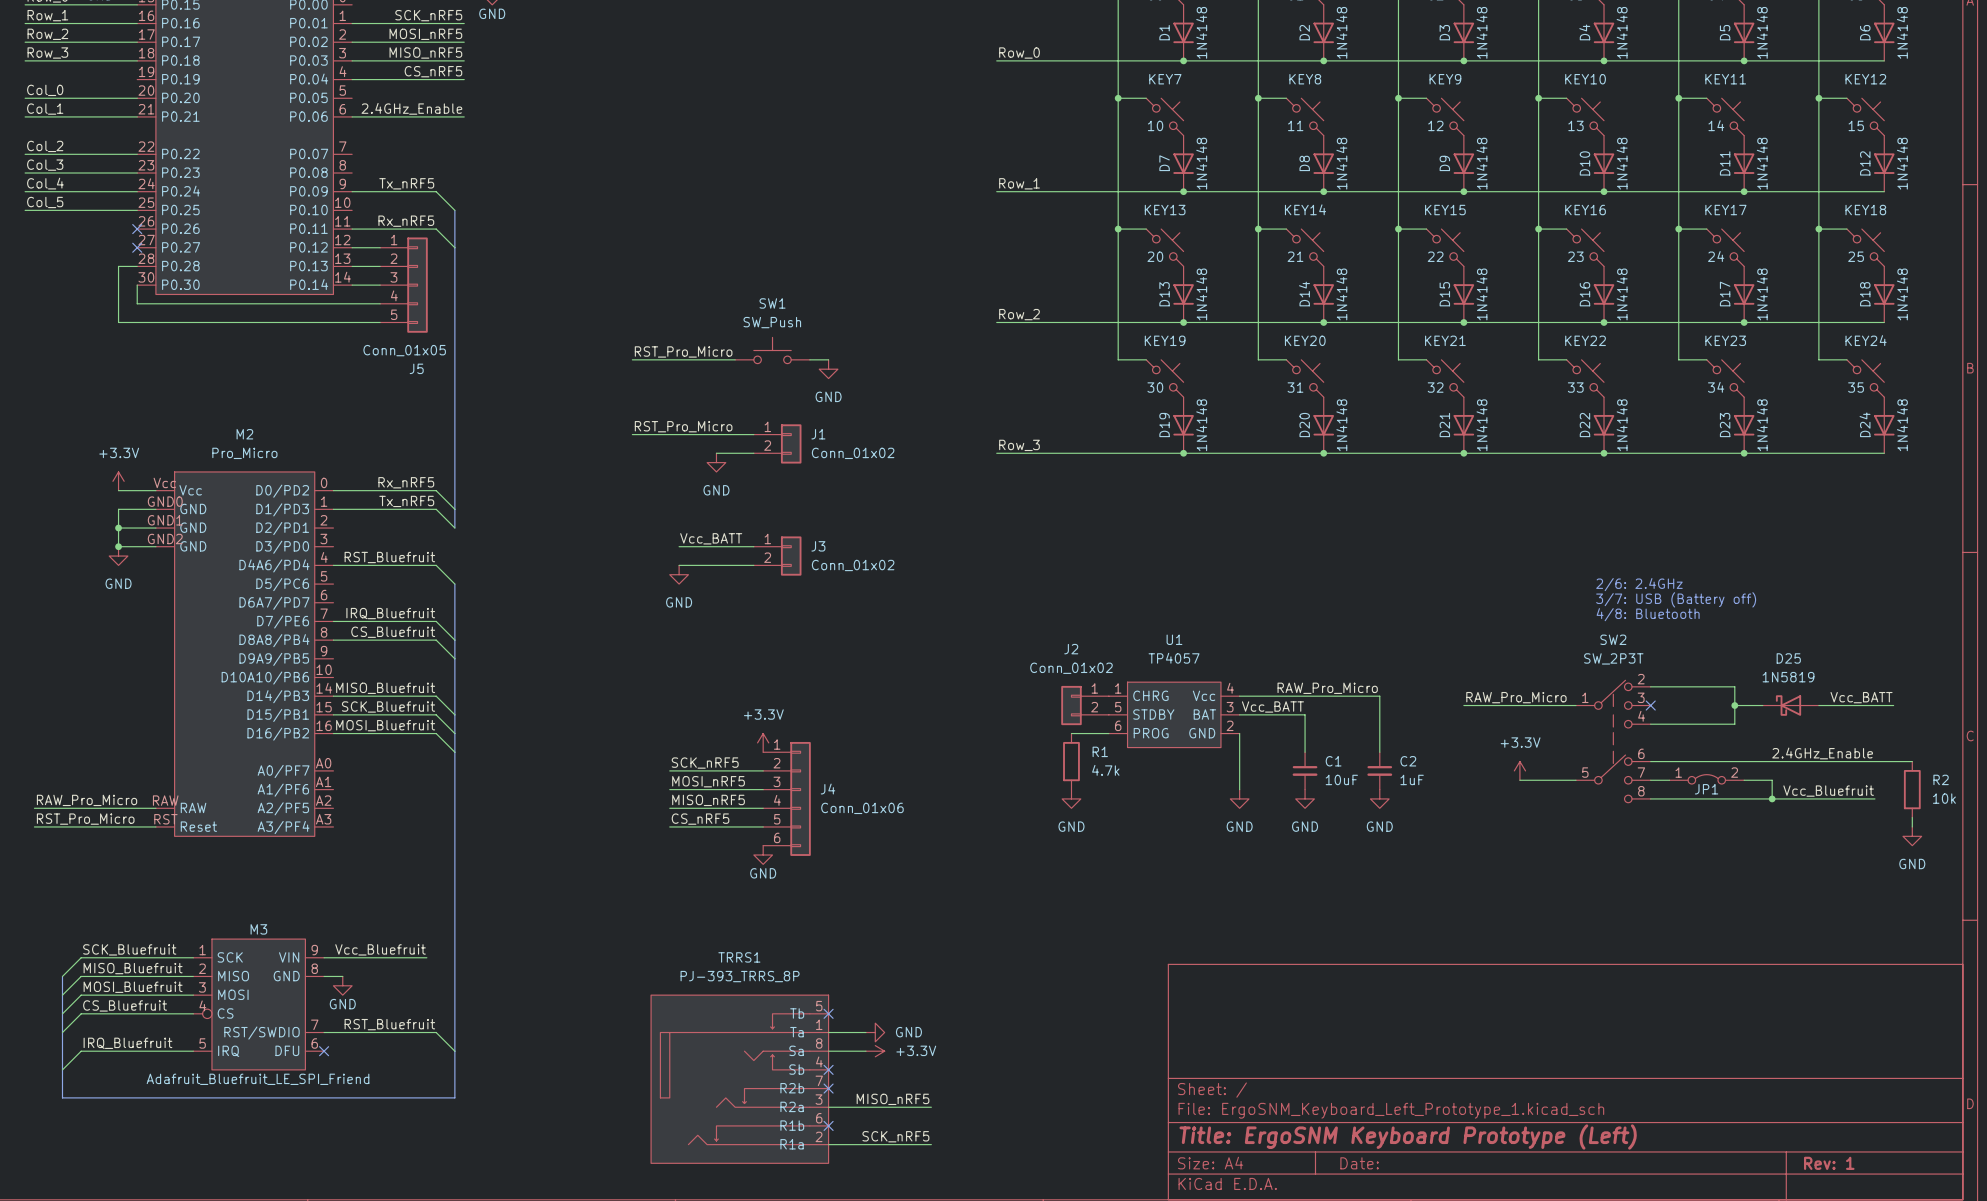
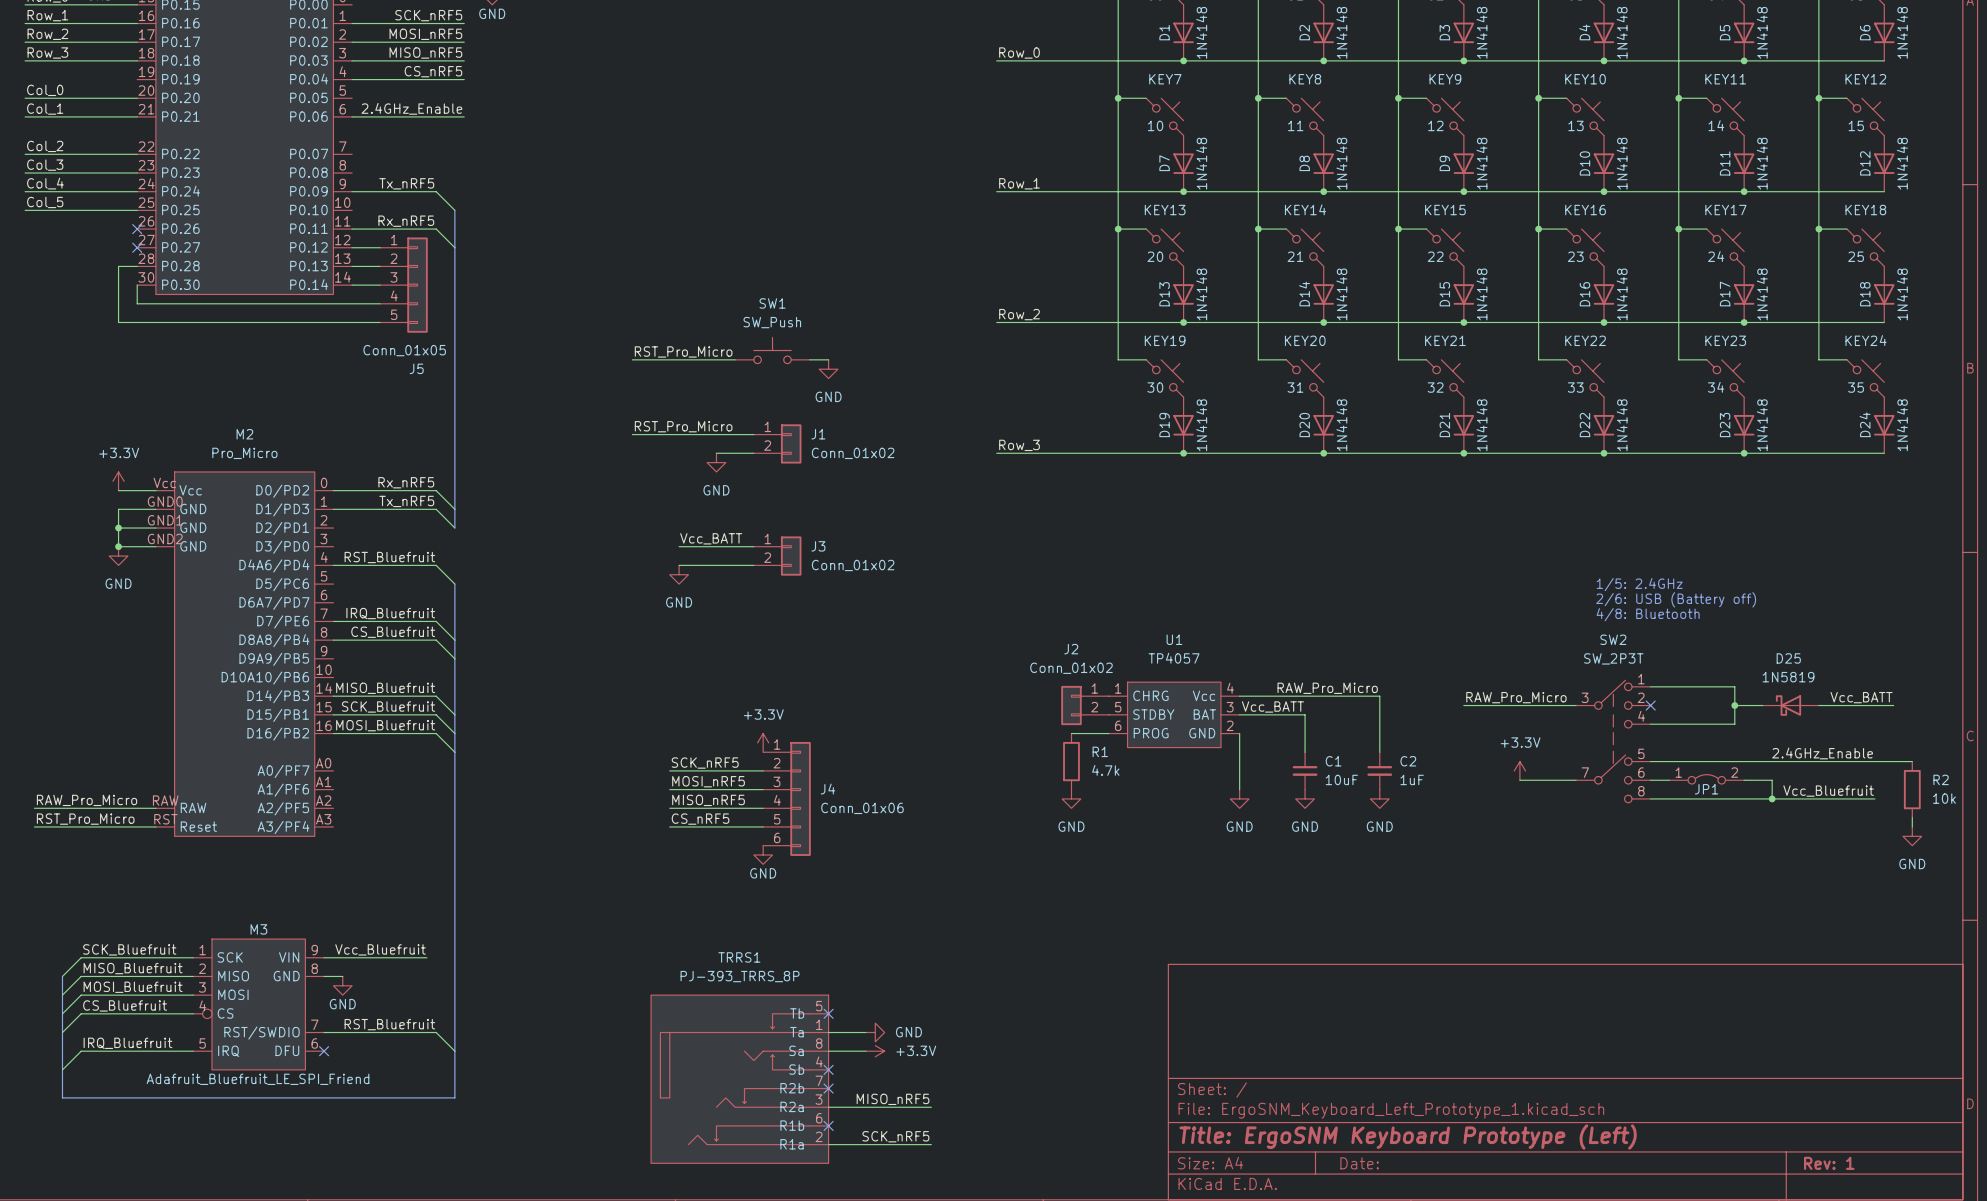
text: 2/6: 2.4GHz (1639, 584) -> 1/5: 2.4GHz (1639, 584)
text: 3/7: USB (Battery off) (1676, 599) -> 2/6: USB (Battery off) (1676, 599)
SW2 pin number: 2 (1641, 679) -> 1 (1641, 679)
SW2 pin number: 1 (1585, 697) -> 3 (1585, 697)
SW2 pin number: 3 (1641, 697) -> 2 (1641, 697)
SW2 pin number: 6 (1641, 753) -> 5 (1641, 753)
SW2 pin number: 5 (1585, 772) -> 7 (1585, 772)
SW2 pin number: 7 (1641, 772) -> 6 (1641, 772)

